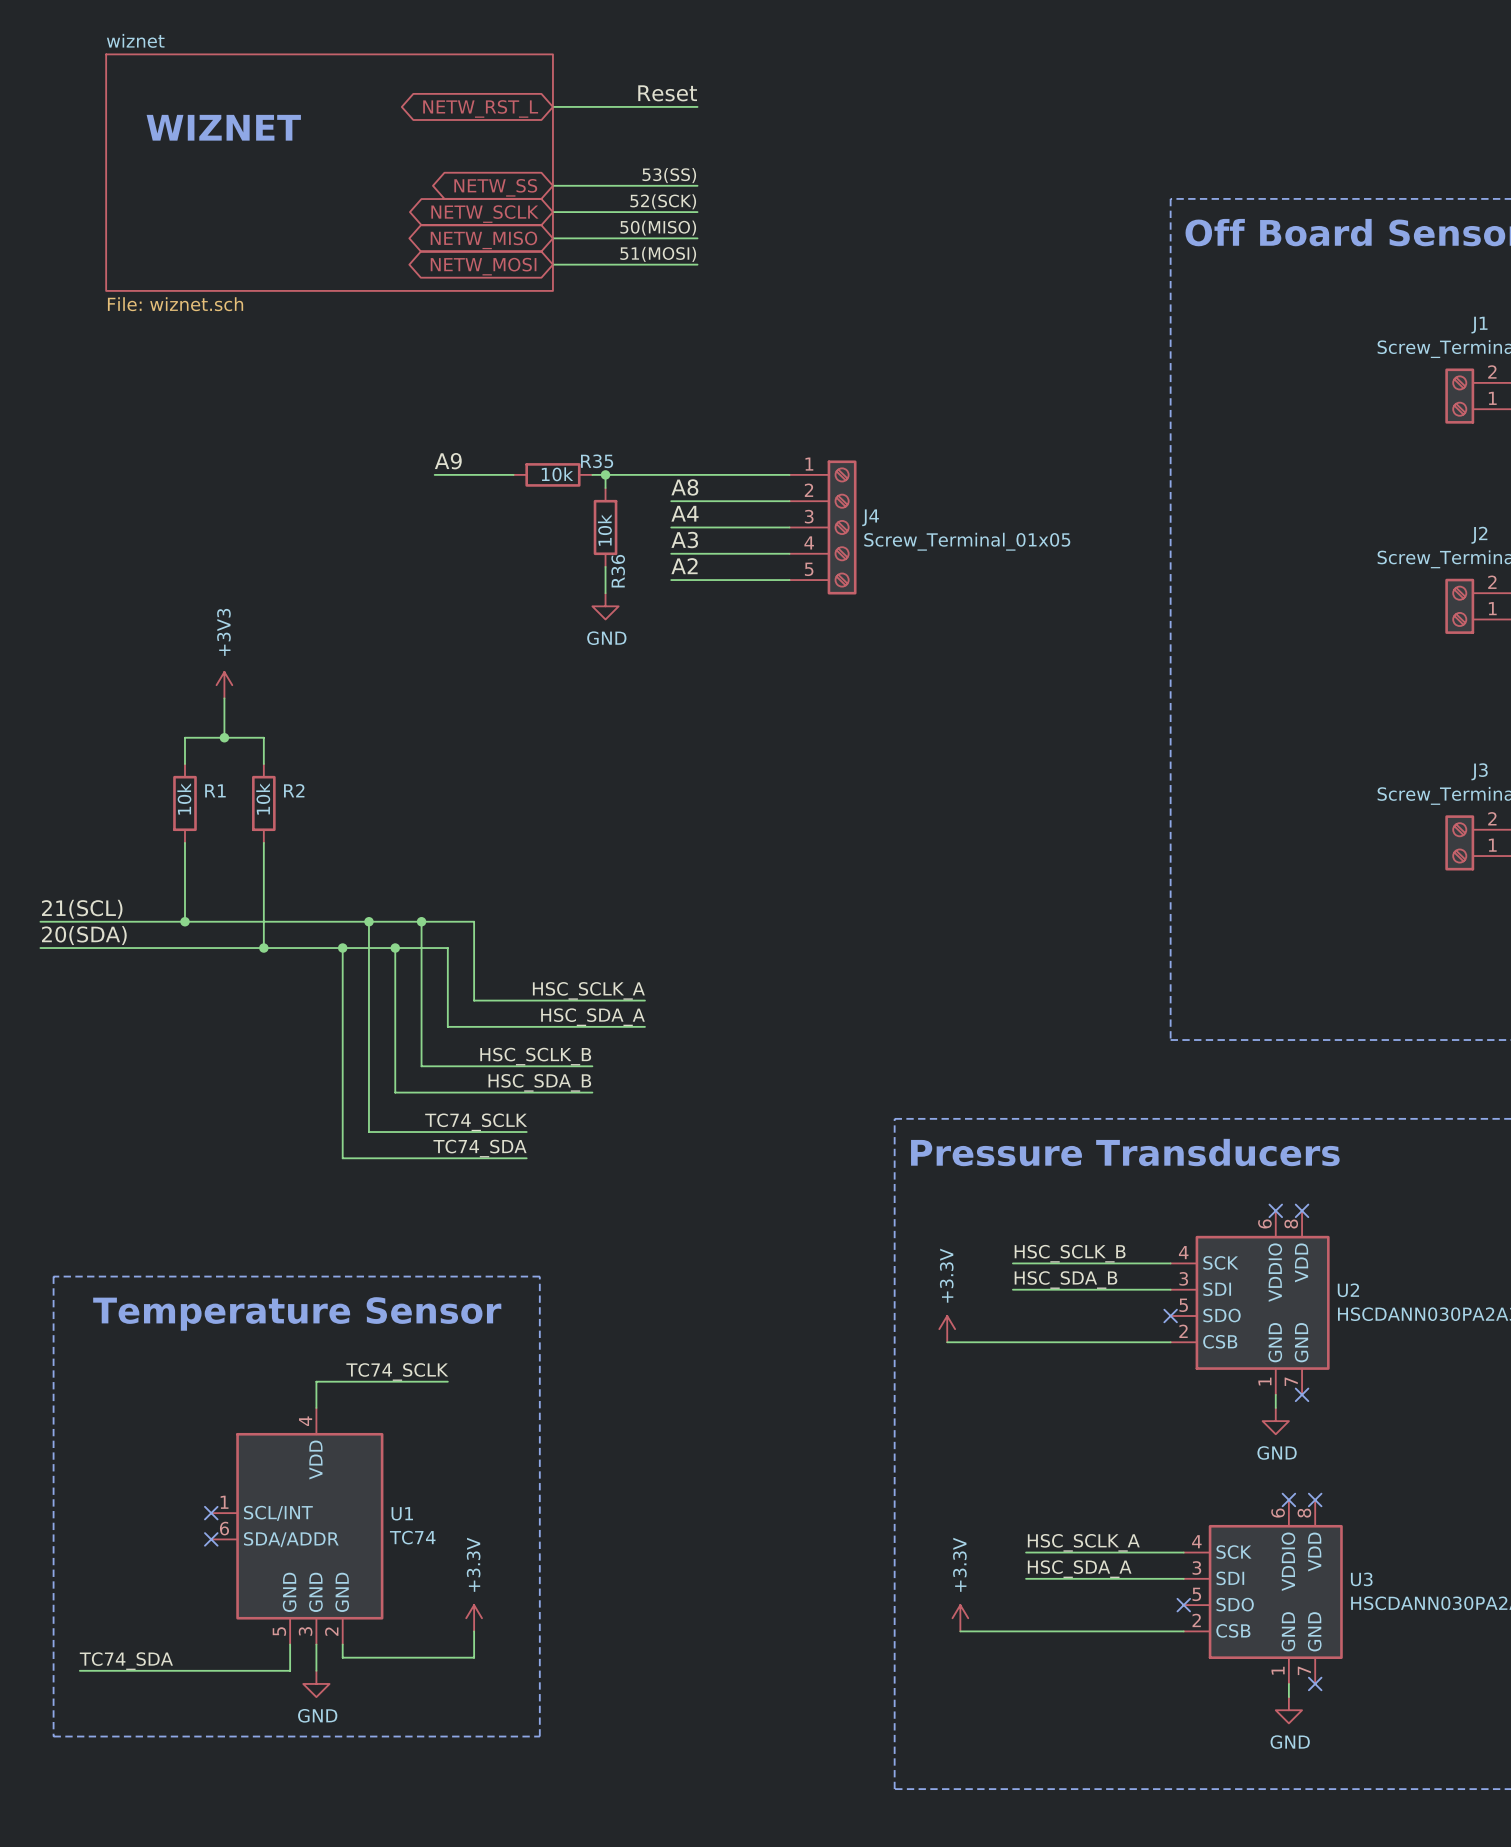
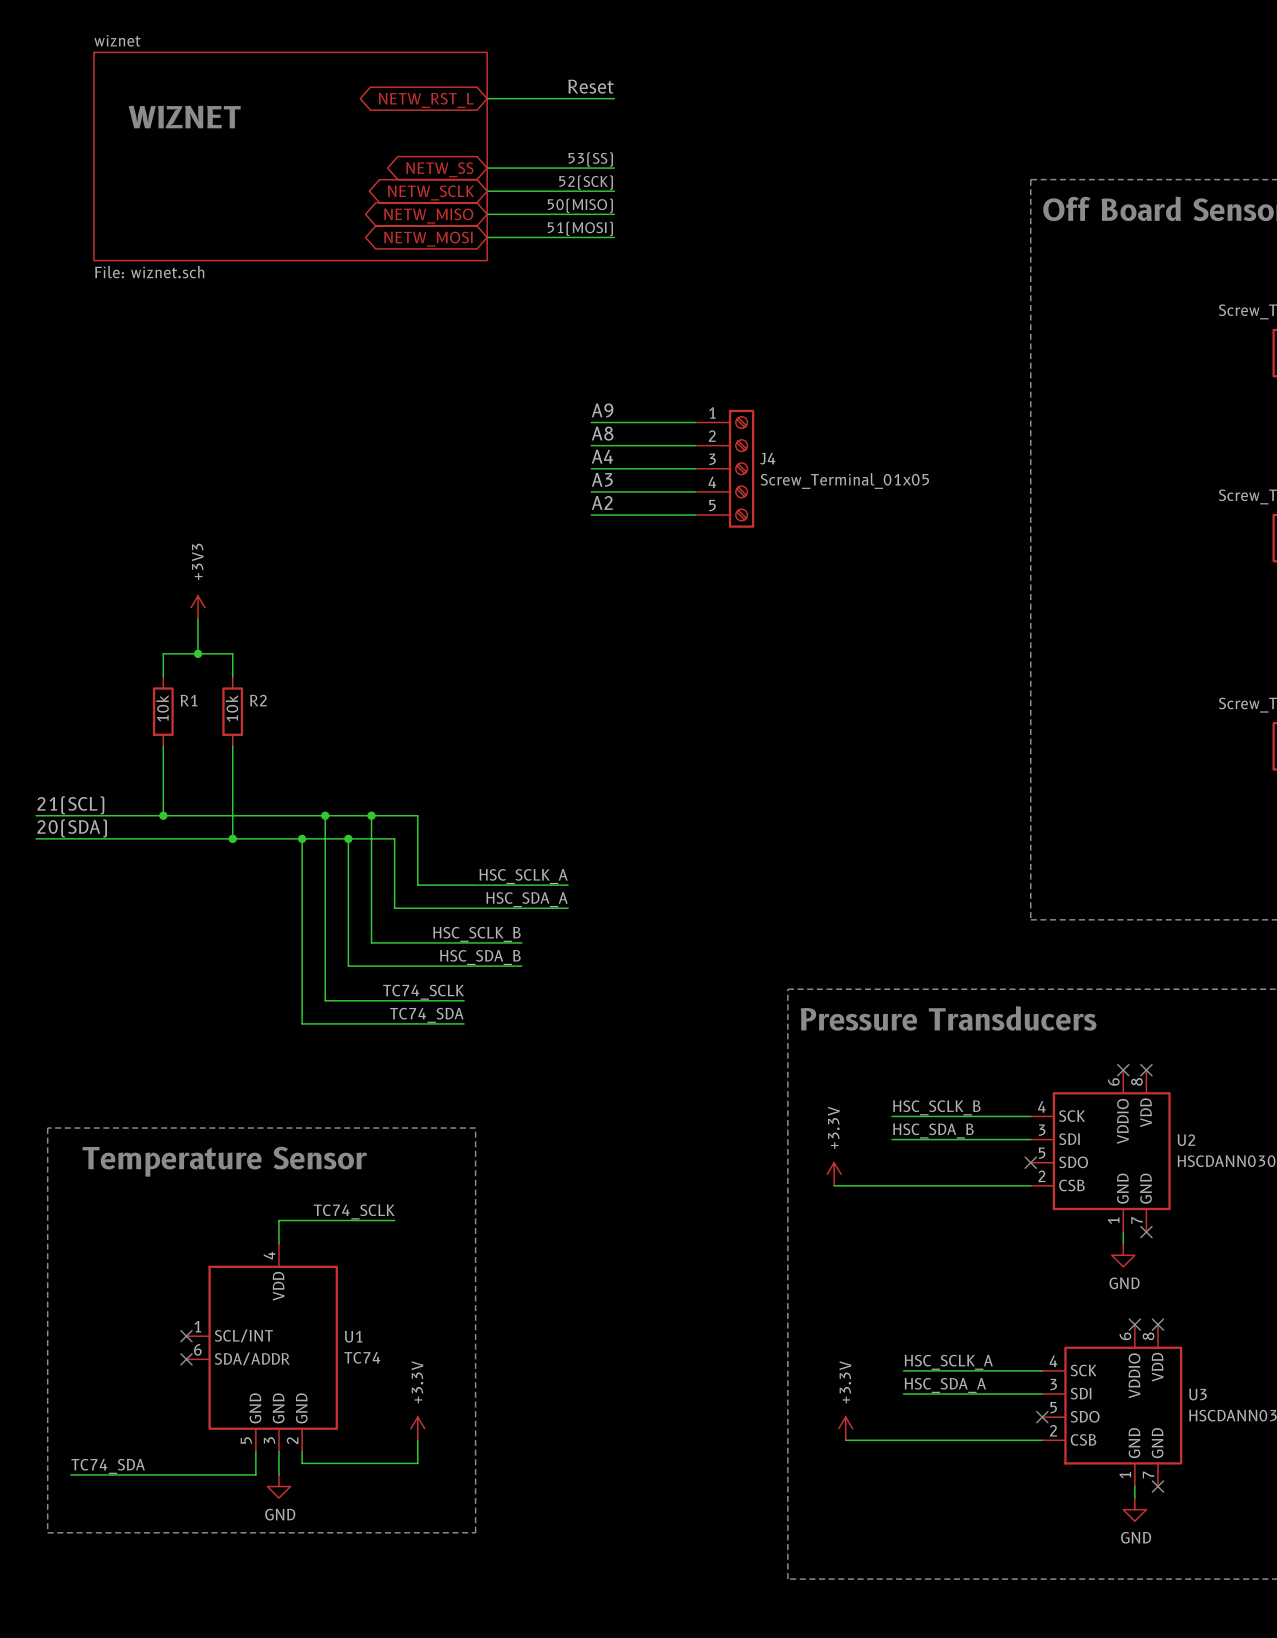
label position: A9 (448, 461) -> A9 (602, 410)
wire: (434, 474) (513, 474) -> none
R35: 10k (552, 474) -> none
wire: (592, 474) (671, 474) -> none
wire: (605, 474) (605, 488) -> none
junction: (605, 474) -> none
R36: 10k (605, 527) -> none
wire: (605, 566) (605, 593) -> none
power symbol: GND (605, 606) -> none

